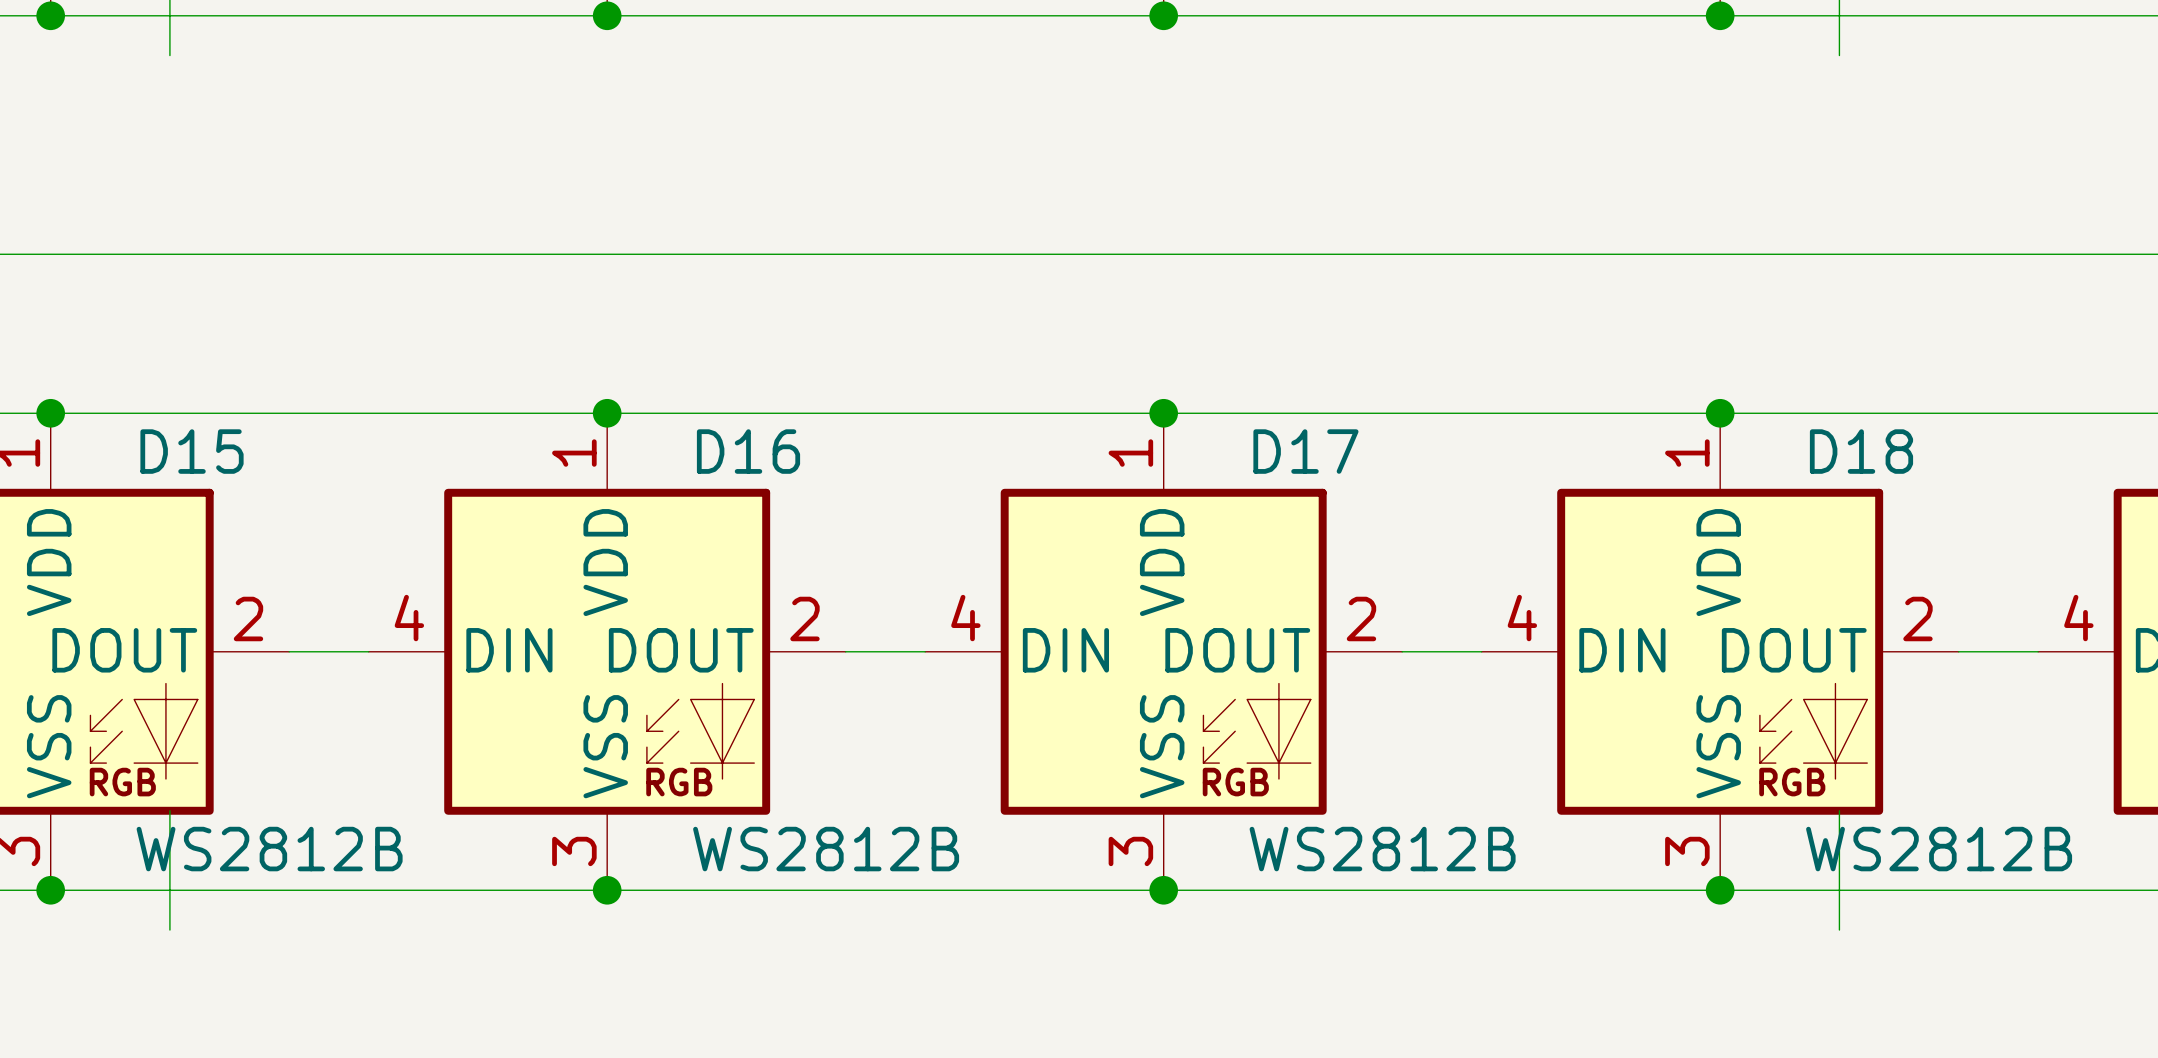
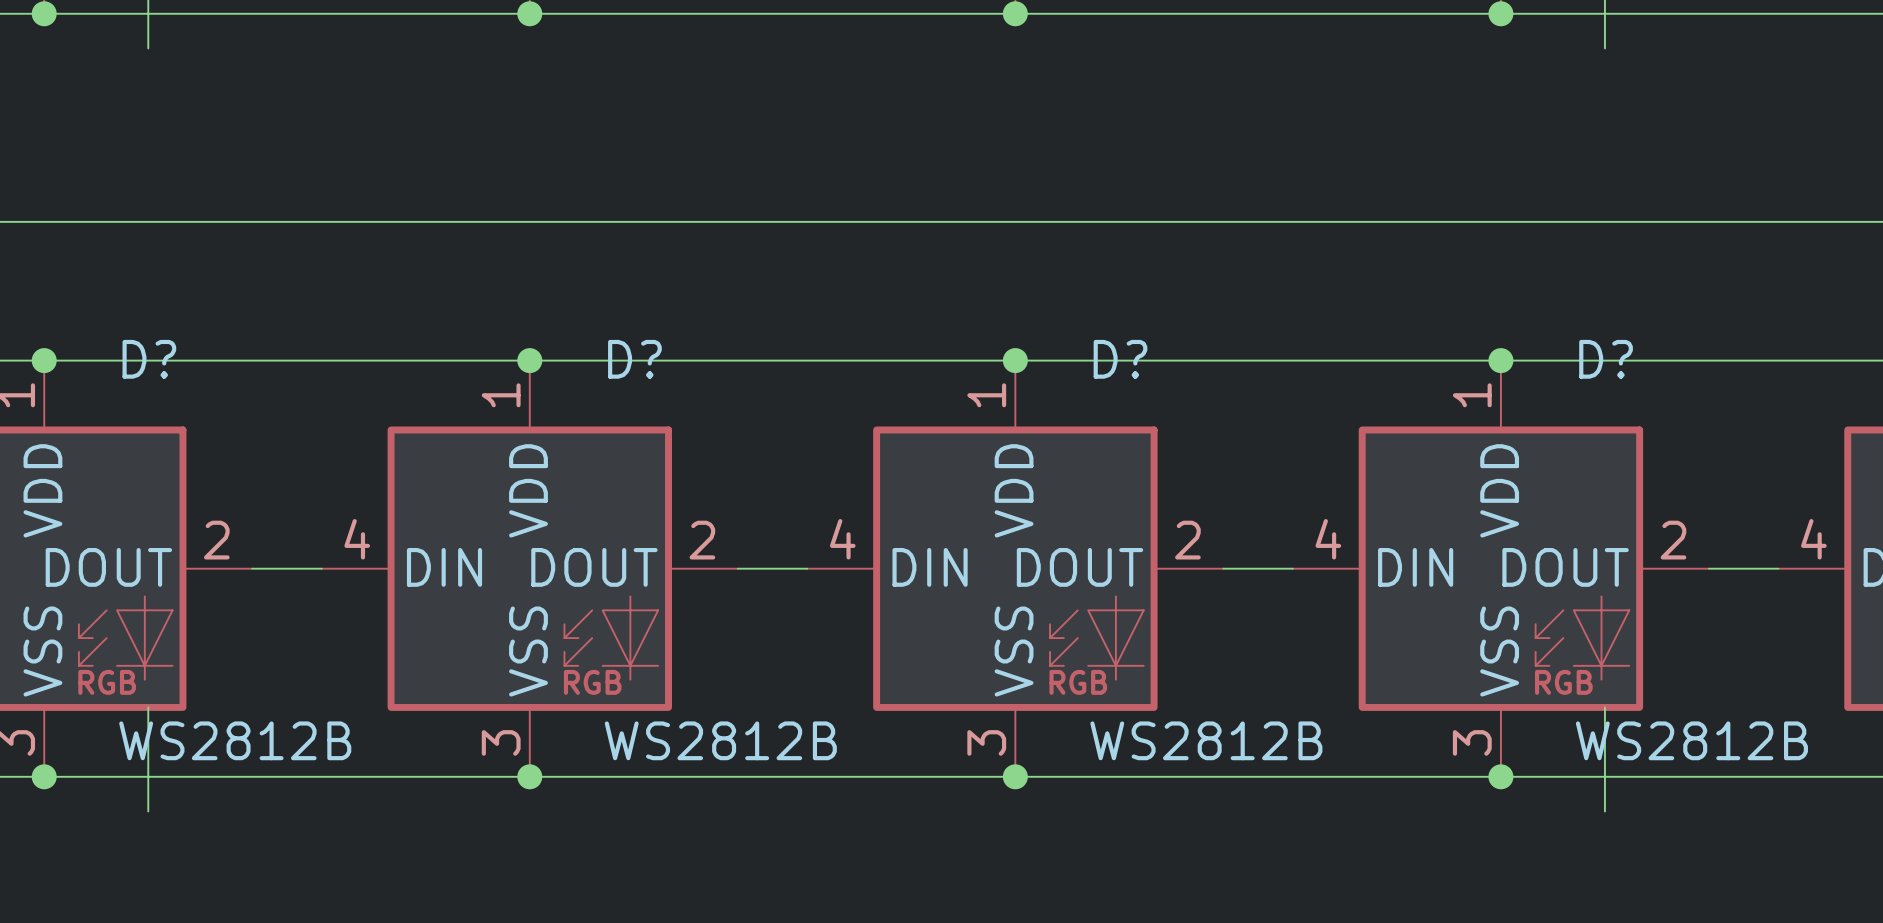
D15 name: D15 (192, 451) -> D? (149, 359)
D16 name: D16 (748, 451) -> D? (634, 359)
D17 name: D17 (1305, 451) -> D? (1120, 359)
D18 name: D18 (1861, 451) -> D? (1606, 359)

